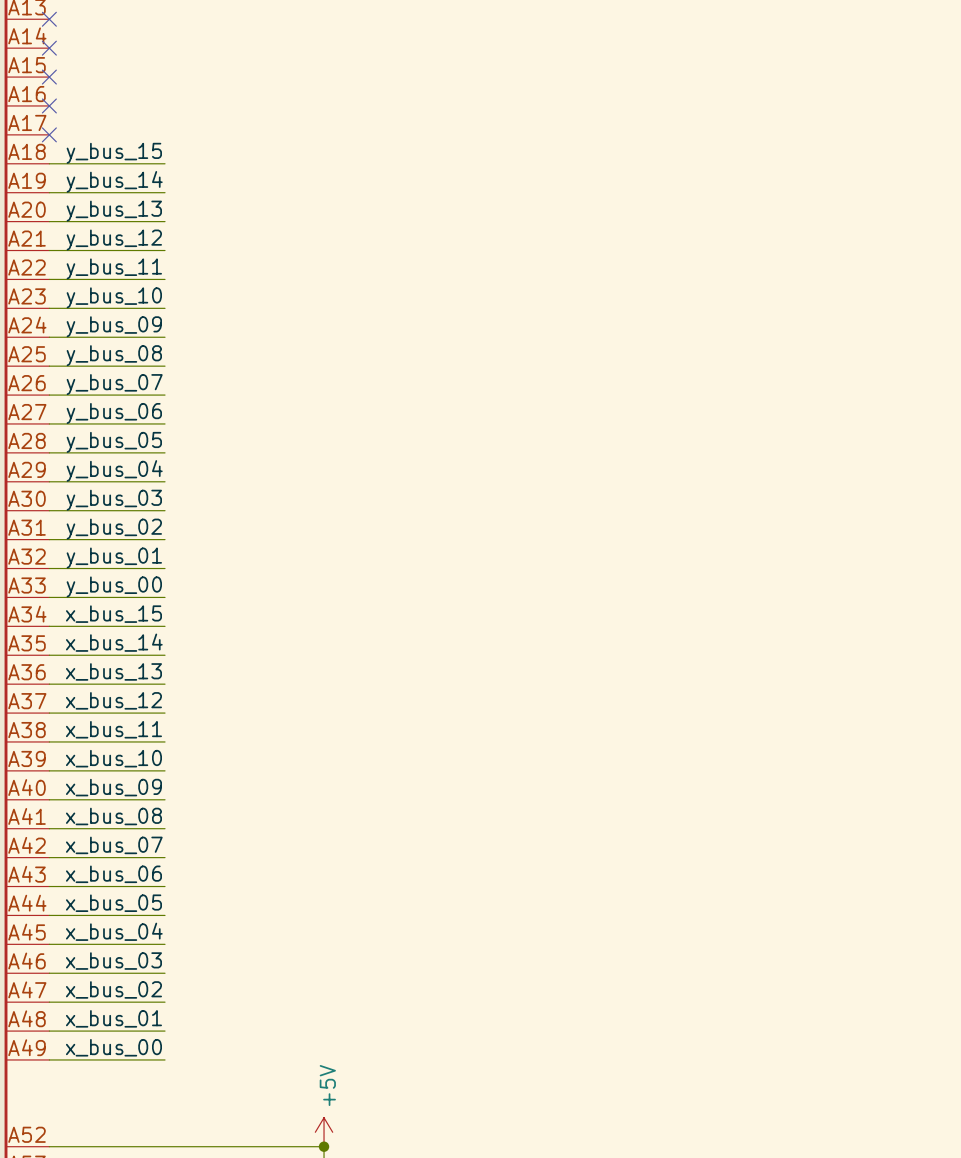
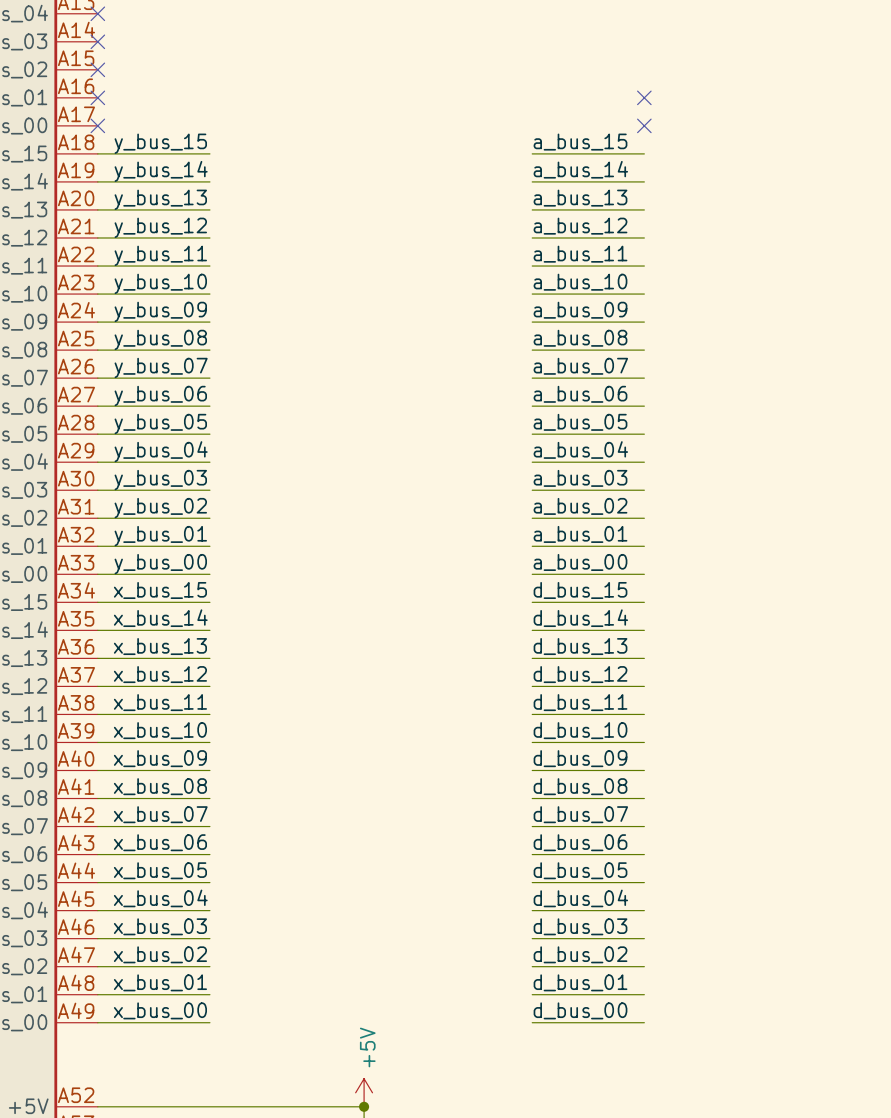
no-connect mark: none -> (644, 97)
no-connect mark: none -> (644, 125)
label: none -> a_bus_15 (580, 142)
wire: none -> (532, 153) (644, 153)
label: none -> a_bus_14 (580, 169)
wire: none -> (532, 181) (644, 181)
label: none -> a_bus_13 (580, 198)
wire: none -> (532, 209) (644, 209)
label: none -> a_bus_12 (580, 226)
wire: none -> (532, 237) (644, 237)
label: none -> a_bus_11 (580, 254)
wire: none -> (532, 266) (644, 266)
label: none -> a_bus_10 (580, 282)
wire: none -> (532, 294) (644, 294)
label: none -> a_bus_09 (580, 310)
wire: none -> (532, 322) (644, 322)
label: none -> a_bus_08 (580, 338)
wire: none -> (532, 350) (644, 350)
label: none -> a_bus_07 (580, 366)
wire: none -> (532, 378) (644, 378)
label: none -> a_bus_06 (580, 394)
wire: none -> (532, 406) (644, 406)
label: none -> a_bus_05 (580, 422)
wire: none -> (532, 434) (644, 434)
label: none -> a_bus_04 (580, 450)
wire: none -> (532, 462) (644, 462)
label: none -> a_bus_03 (580, 478)
wire: none -> (532, 490) (644, 490)
label: none -> a_bus_02 (580, 506)
wire: none -> (532, 518) (644, 518)
label: none -> a_bus_01 (580, 534)
wire: none -> (532, 546) (644, 546)
label: none -> a_bus_00 (580, 562)
wire: none -> (532, 574) (644, 574)
label: none -> d_bus_15 (580, 590)
wire: none -> (532, 602) (644, 602)
label: none -> d_bus_14 (580, 618)
wire: none -> (532, 630) (644, 630)
label: none -> d_bus_13 (580, 646)
wire: none -> (532, 658) (644, 658)
label: none -> d_bus_12 (580, 674)
wire: none -> (532, 686) (644, 686)
label: none -> d_bus_11 (580, 702)
wire: none -> (532, 714) (644, 714)
label: none -> d_bus_10 (580, 730)
wire: none -> (532, 742) (644, 742)
label: none -> d_bus_09 (580, 758)
wire: none -> (532, 770) (644, 770)
label: none -> d_bus_08 (580, 786)
wire: none -> (532, 798) (644, 798)
label: none -> d_bus_07 (580, 814)
wire: none -> (532, 826) (644, 826)
label: none -> d_bus_06 (580, 842)
wire: none -> (532, 854) (644, 854)
label: none -> d_bus_05 (580, 870)
wire: none -> (532, 882) (644, 882)
label: none -> d_bus_04 (580, 898)
wire: none -> (532, 910) (644, 910)
label: none -> d_bus_03 (580, 926)
wire: none -> (532, 938) (644, 938)
label: none -> d_bus_02 (580, 954)
wire: none -> (532, 966) (644, 966)
label: none -> d_bus_01 (580, 982)
wire: none -> (532, 994) (644, 994)
label: none -> d_bus_00 (580, 1010)
wire: none -> (532, 1022) (644, 1022)

